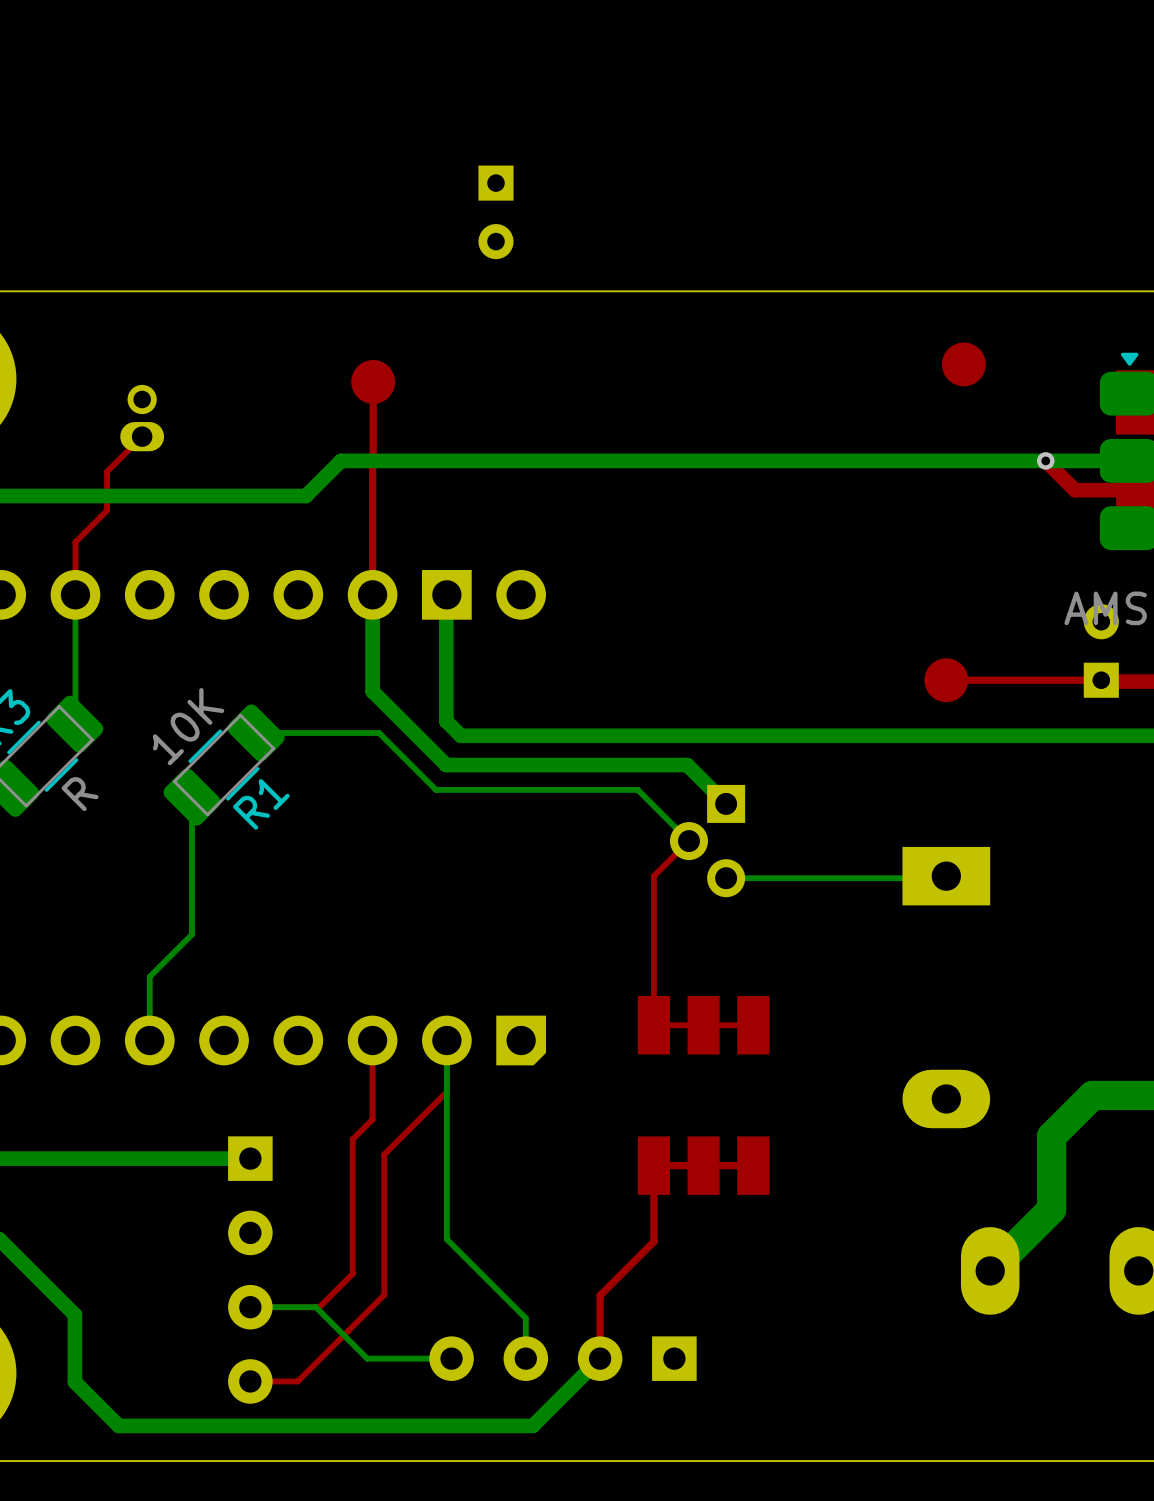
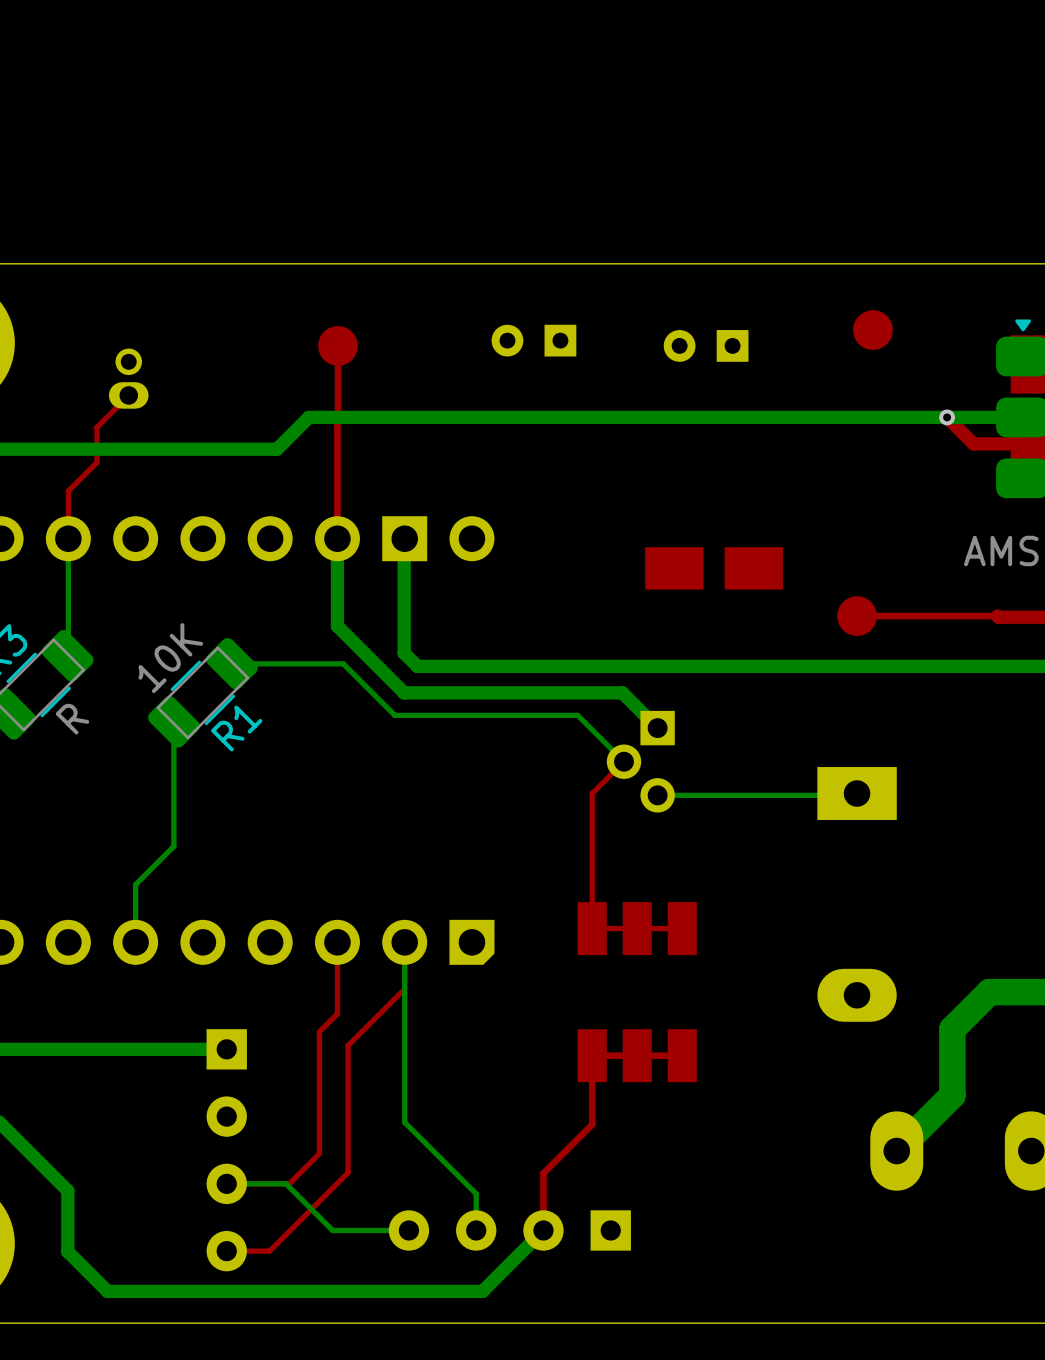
part: (495, 212) -> none
part: none -> (533, 340)
part: none -> (706, 345)
part: none -> (714, 568)
part: (1101, 650) -> none

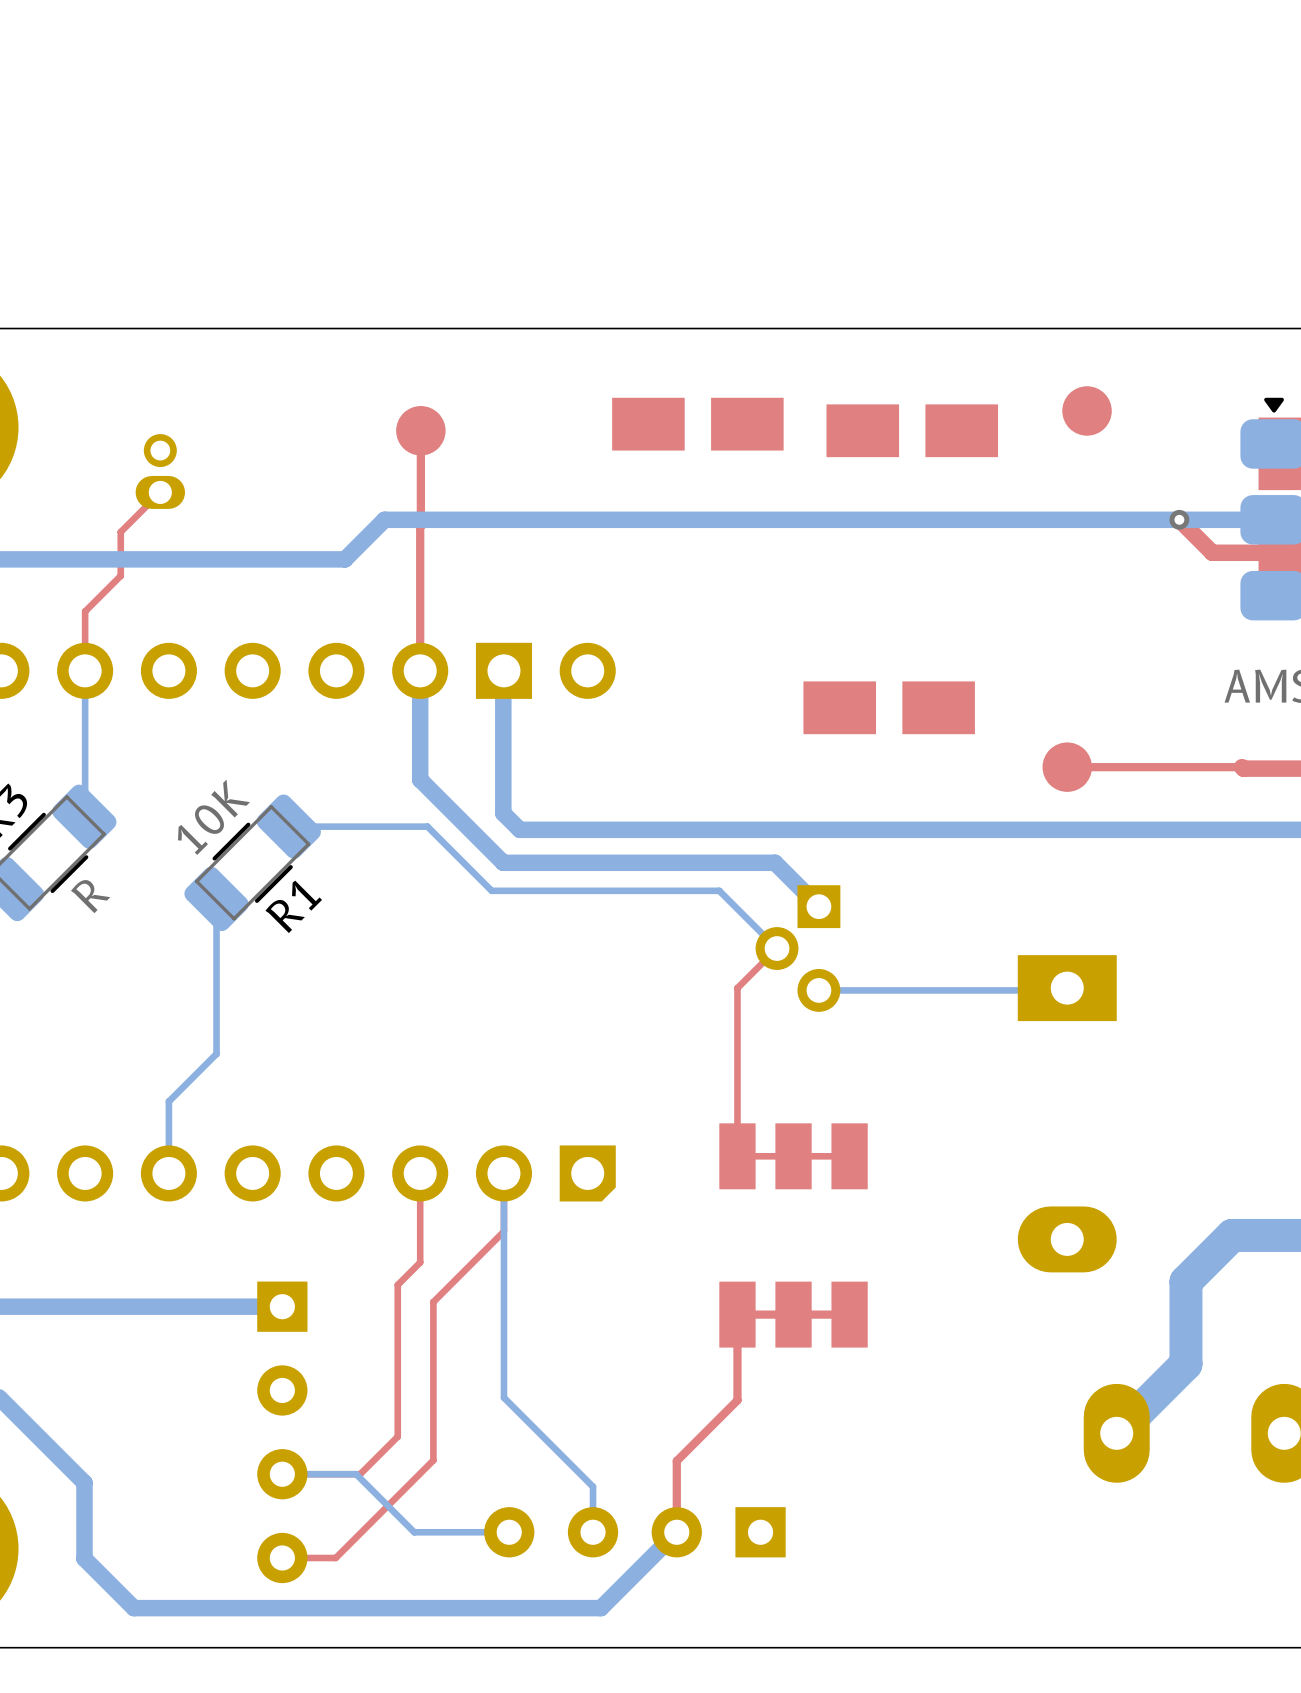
part footprint: [491, 324, 577, 357] -> [612, 397, 784, 451]
part footprint: [663, 330, 749, 362] -> [826, 404, 999, 458]

